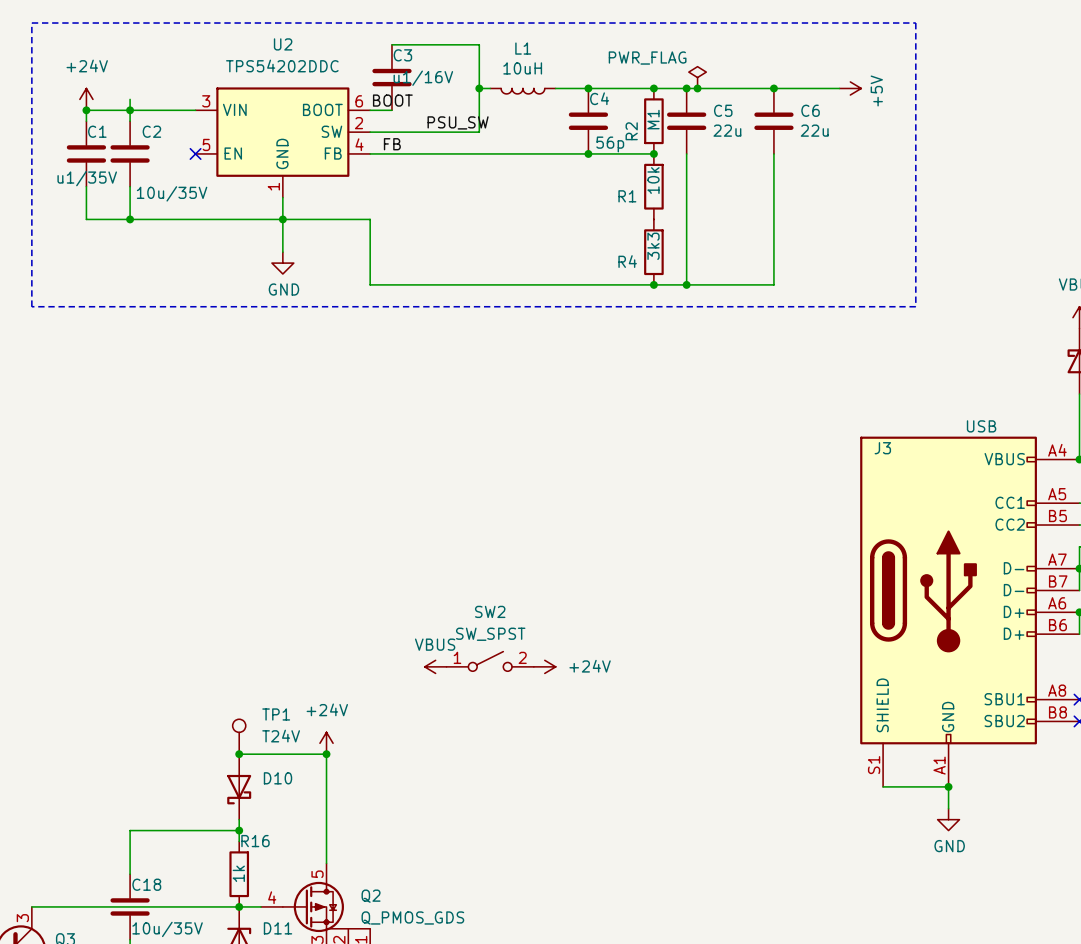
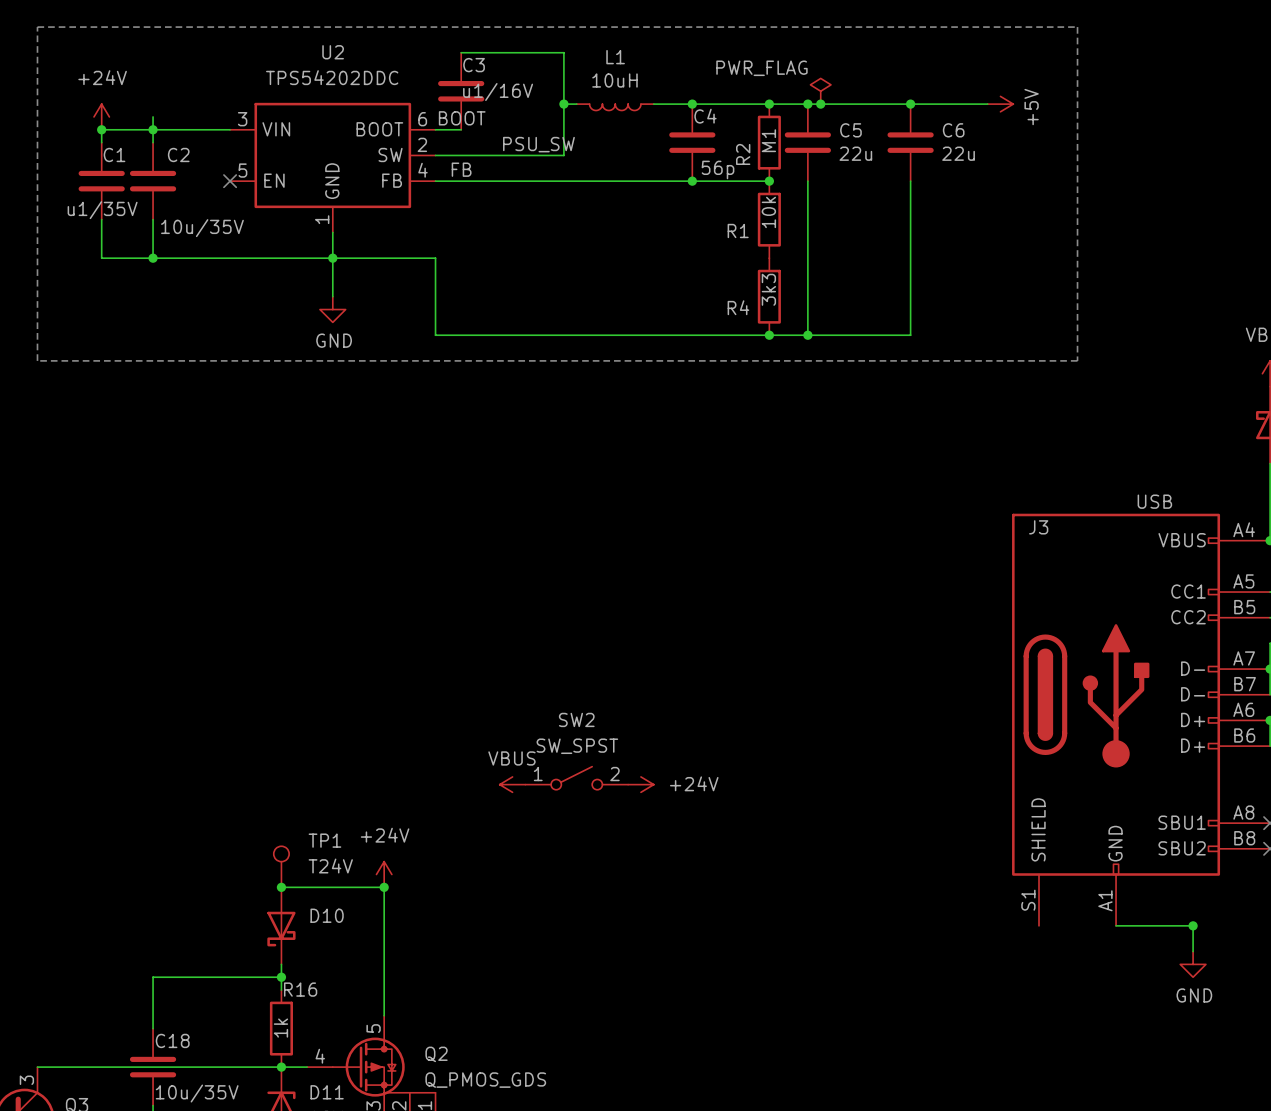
wire: (883, 786) (948, 786) (948, 808) -> (1116, 925) (1193, 925) (1193, 951)
junction: (948, 786) -> none
junction: none -> (1193, 925)
power symbol position: GND (948, 819) -> GND (1193, 964)

